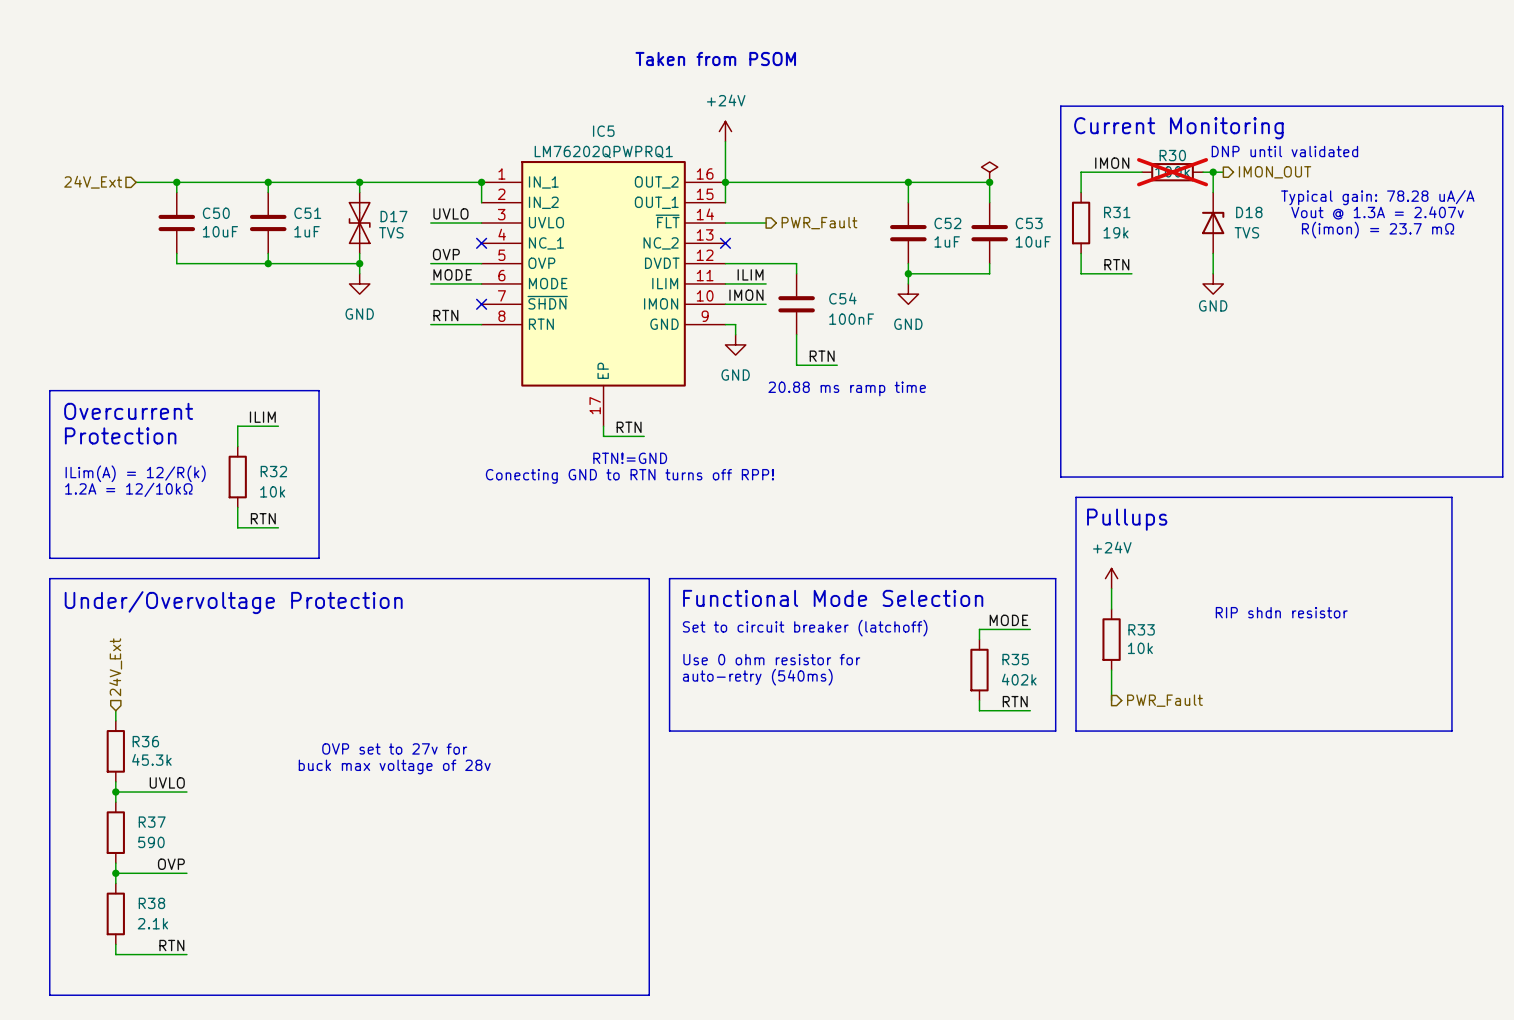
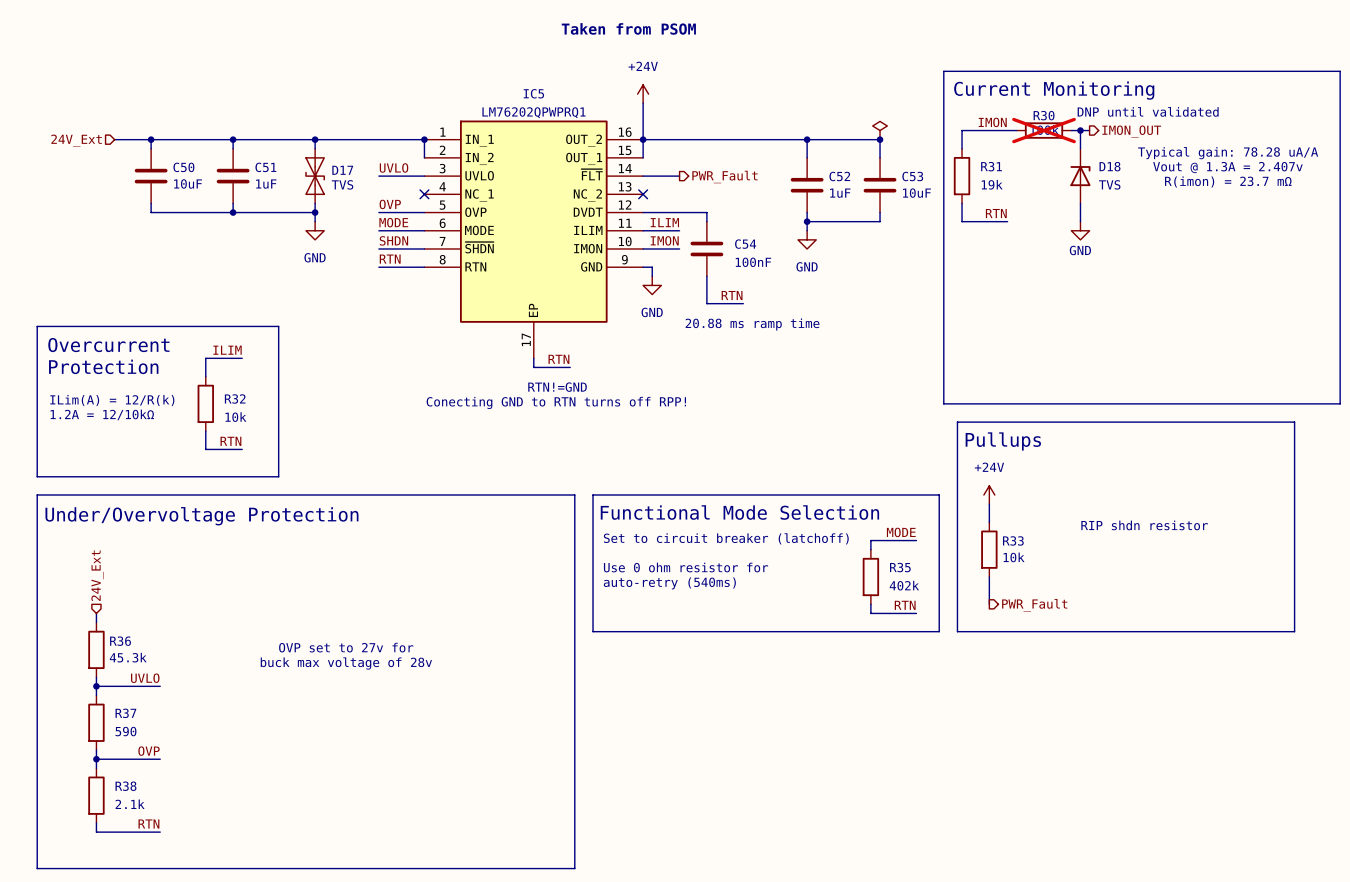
label: none -> SHDN (393, 240)
wire: none -> (378, 248) (424, 248)
no-connect mark: (481, 304) -> none

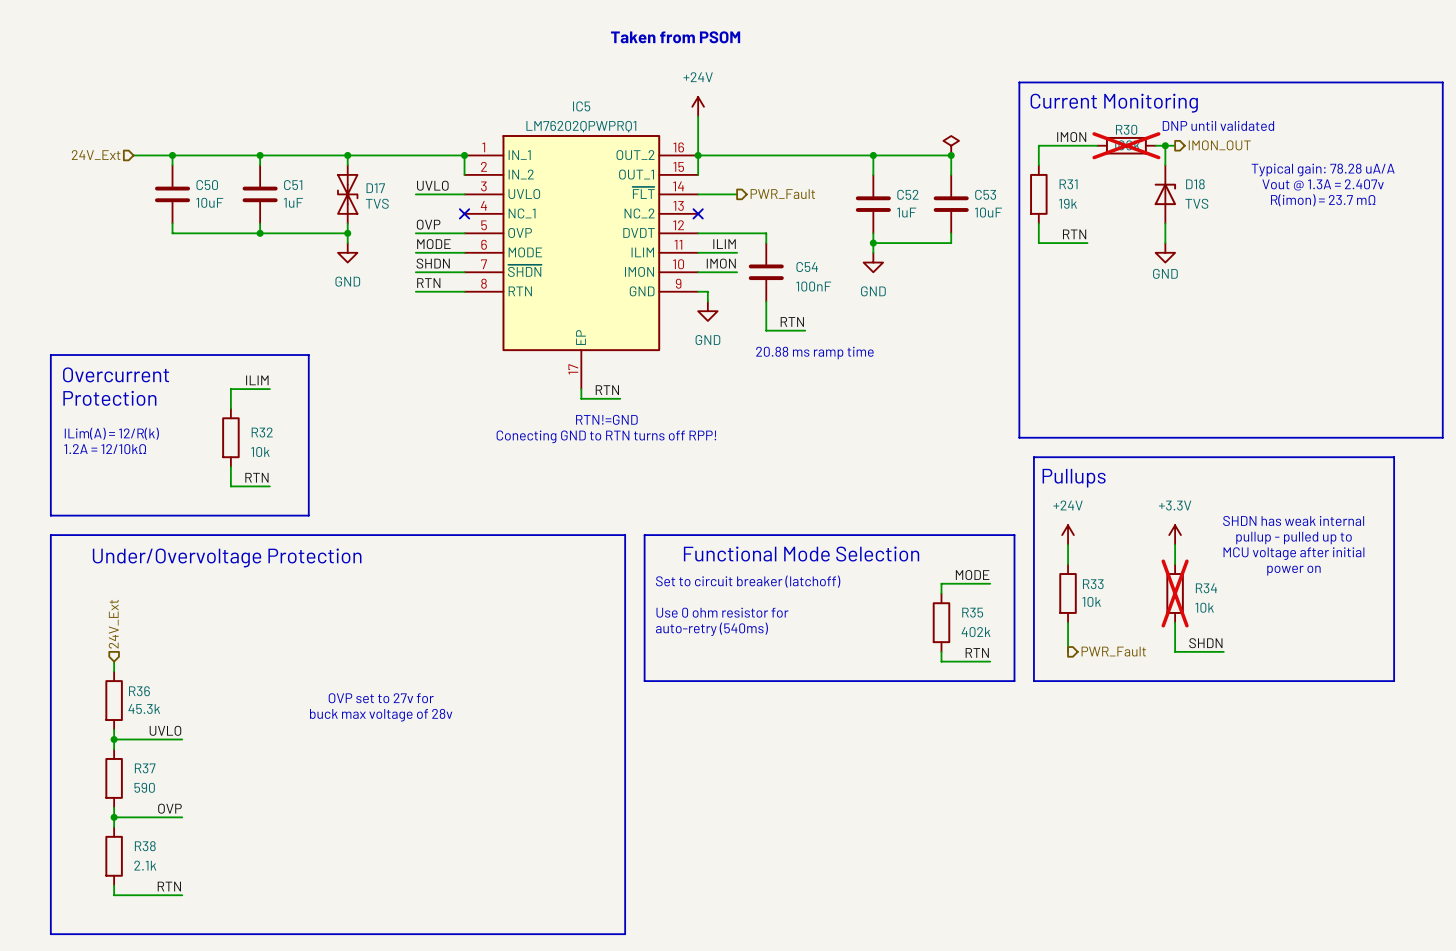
text: none -> SHDN has weak internal (1293, 520)
power symbol: none -> +3.3V (1175, 535)
text: none -> pullup - pulled up to (1294, 538)
wire: none -> (1175, 544) (1175, 564)
text: none -> MCU voltage after initial (1293, 553)
text: RIP shdn resistor (1144, 525) -> none
text: none -> power on (1293, 570)
R34: none -> 10k (1175, 593)
wire: none -> (1175, 622) (1175, 651) (1223, 651)
label: none -> SHDN (1205, 643)

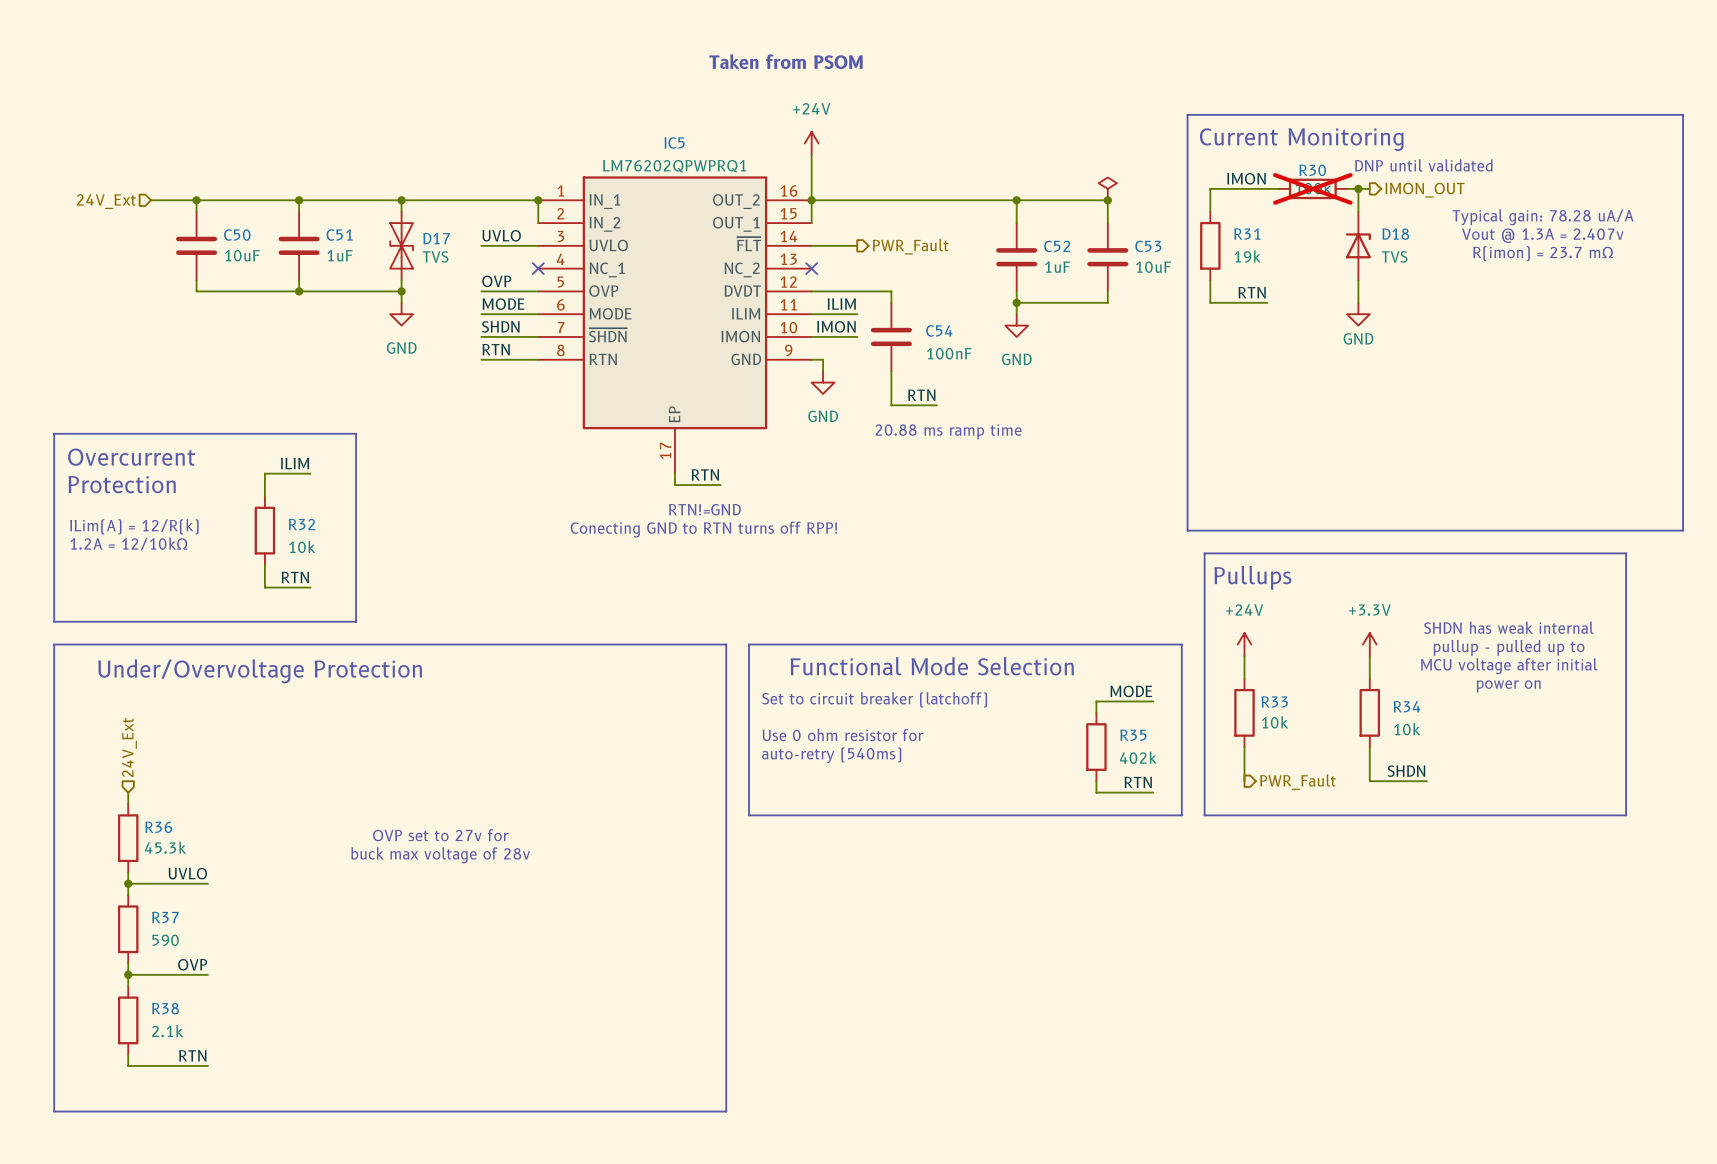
R34 do-not-place cross: (1175, 593) -> none

